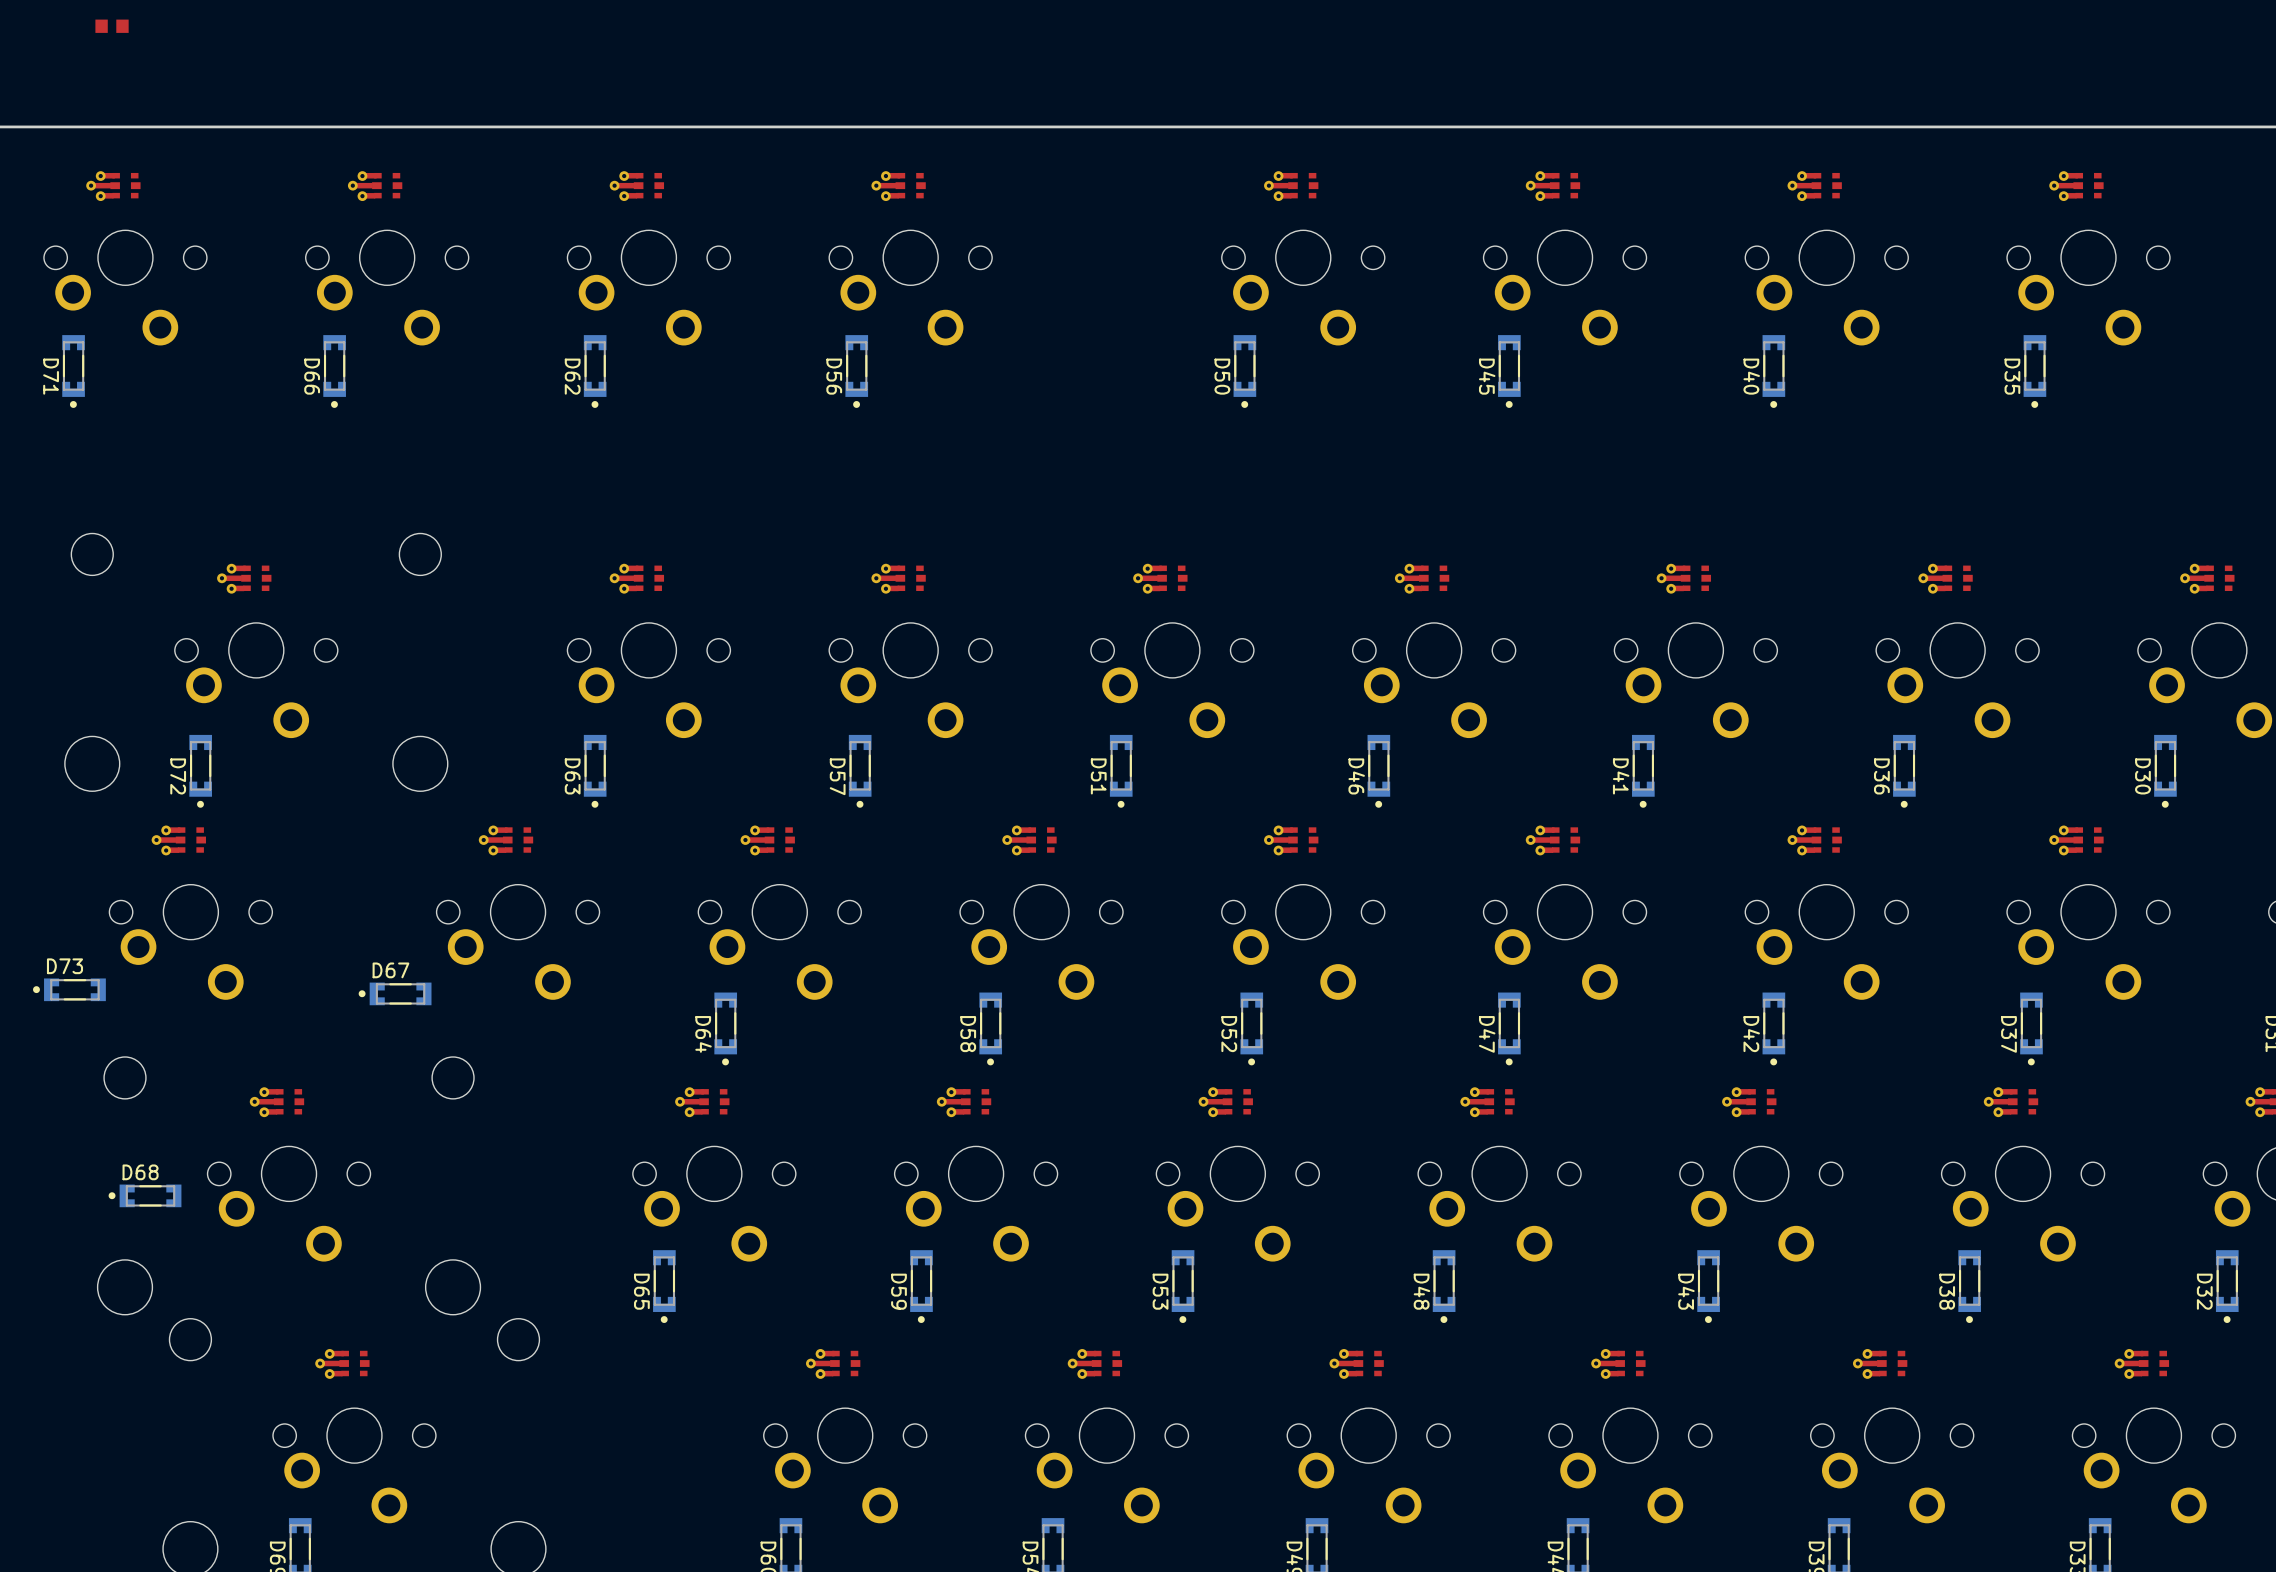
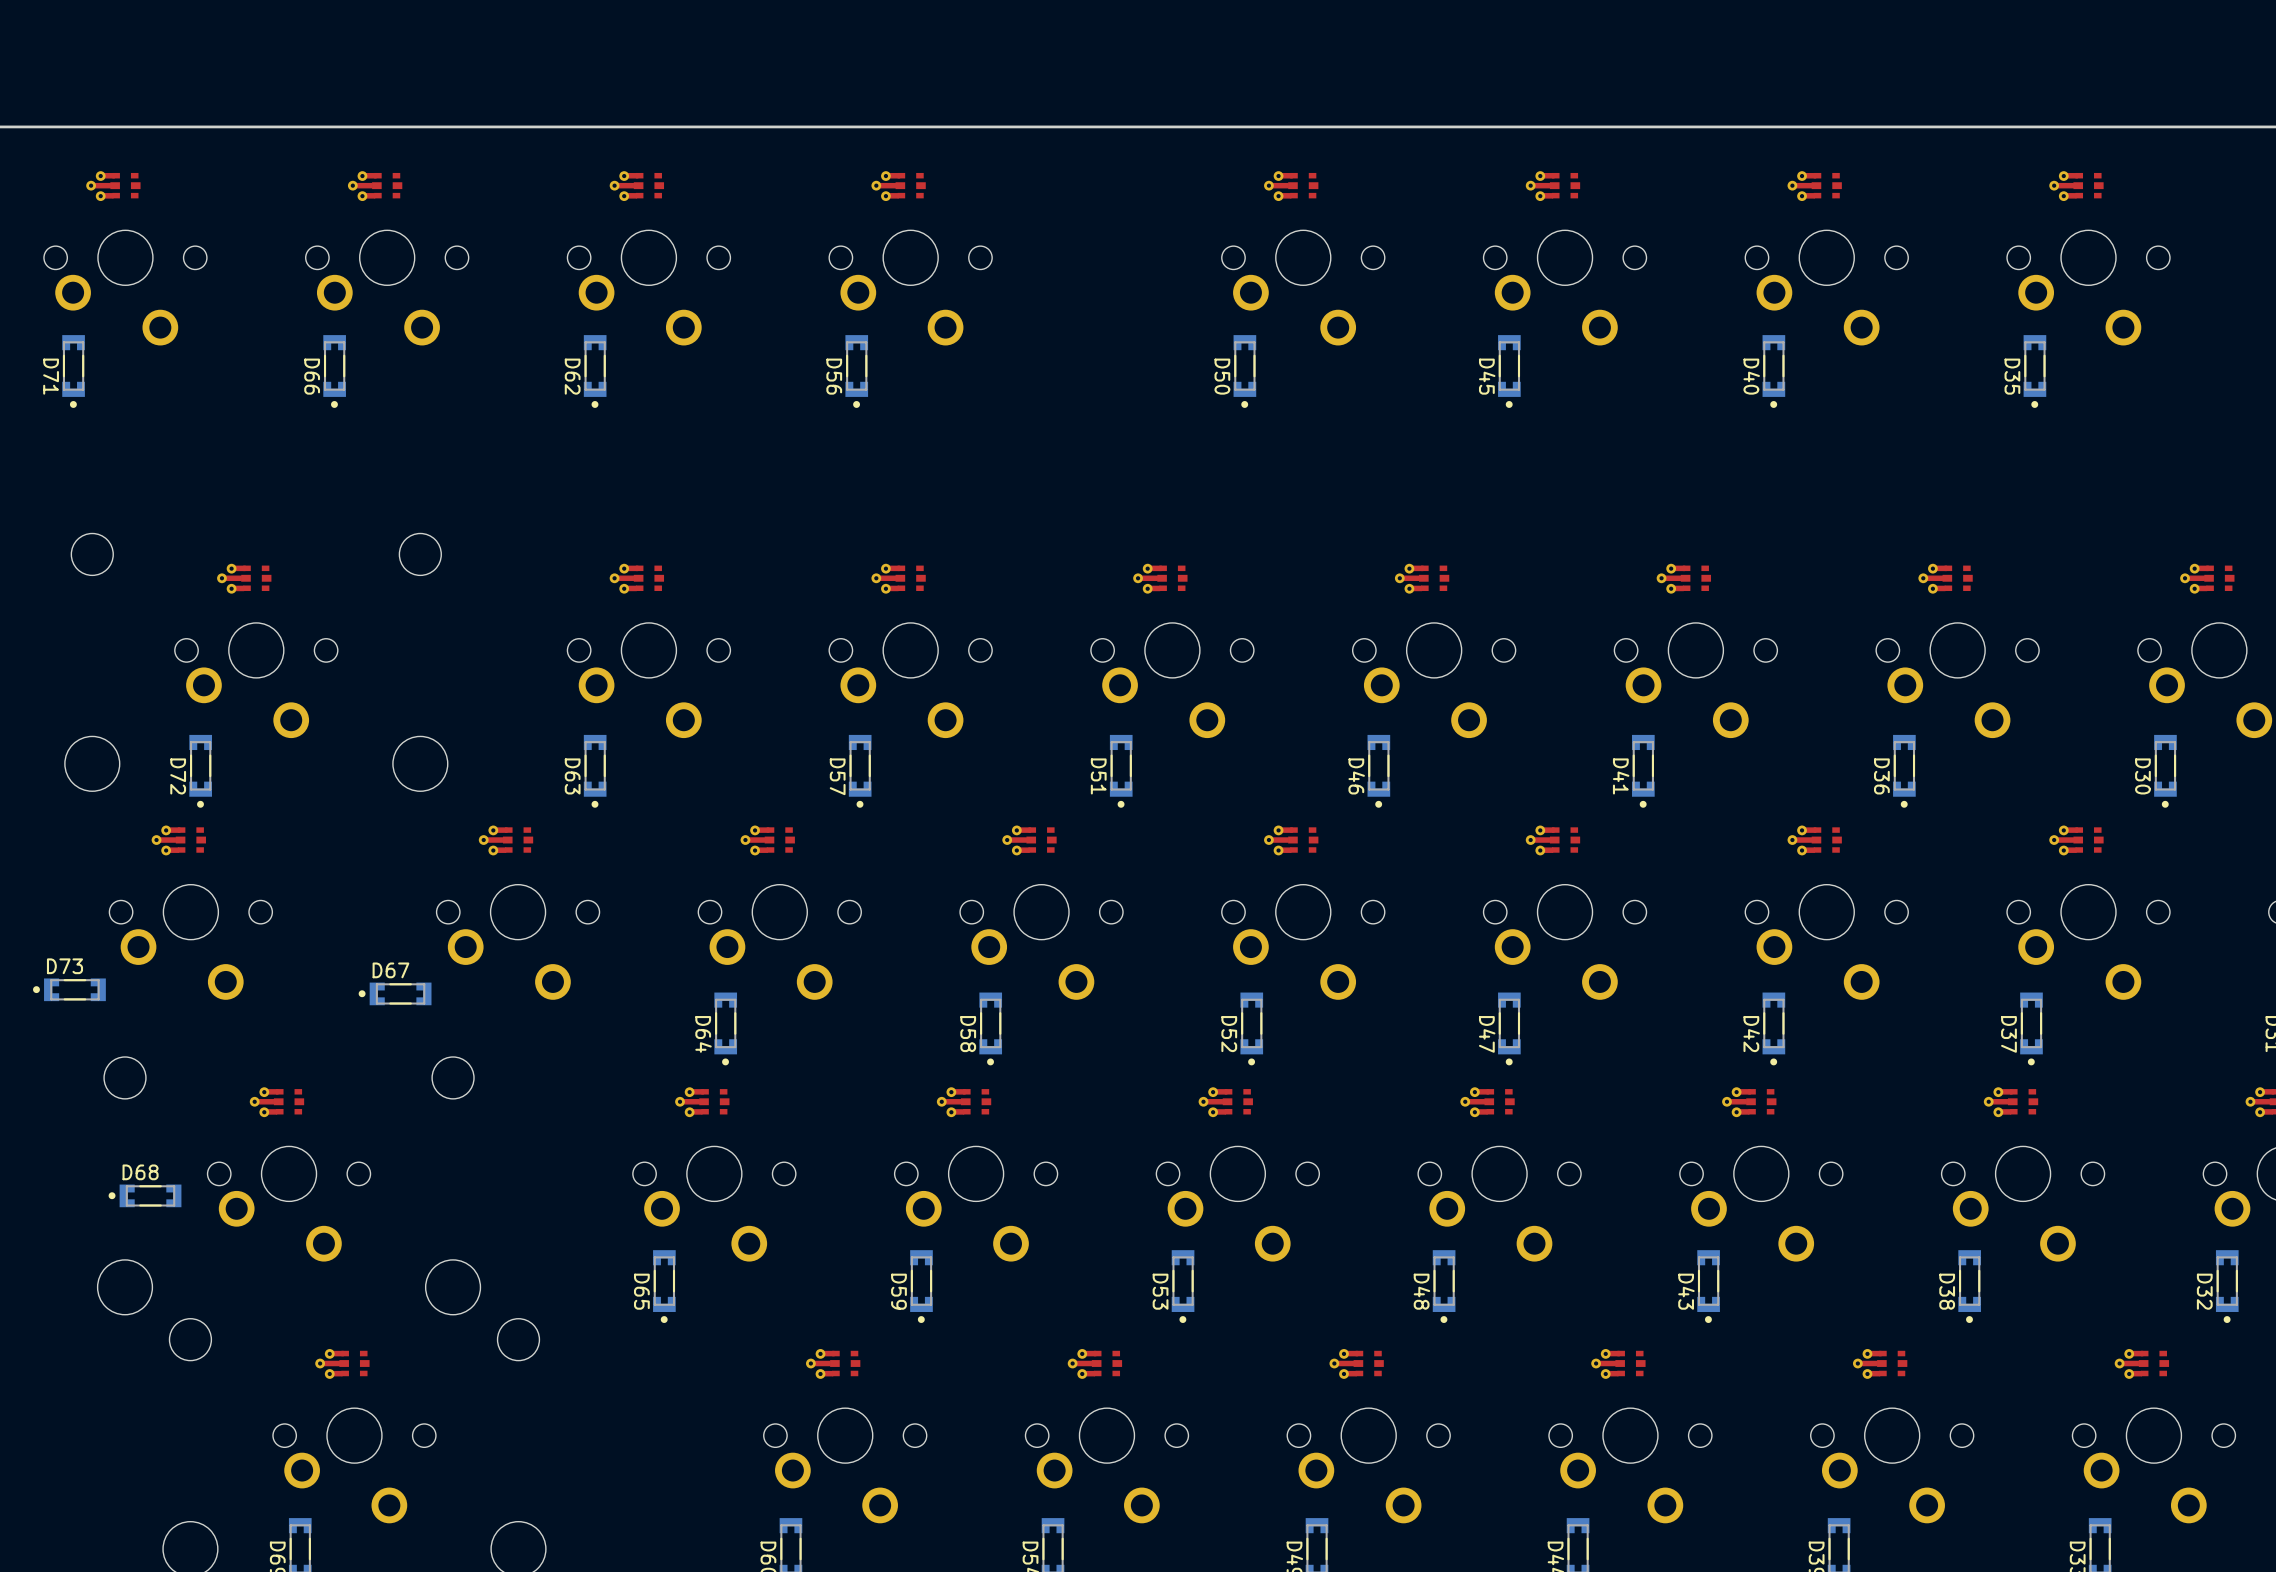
part: (112, 26) -> none

